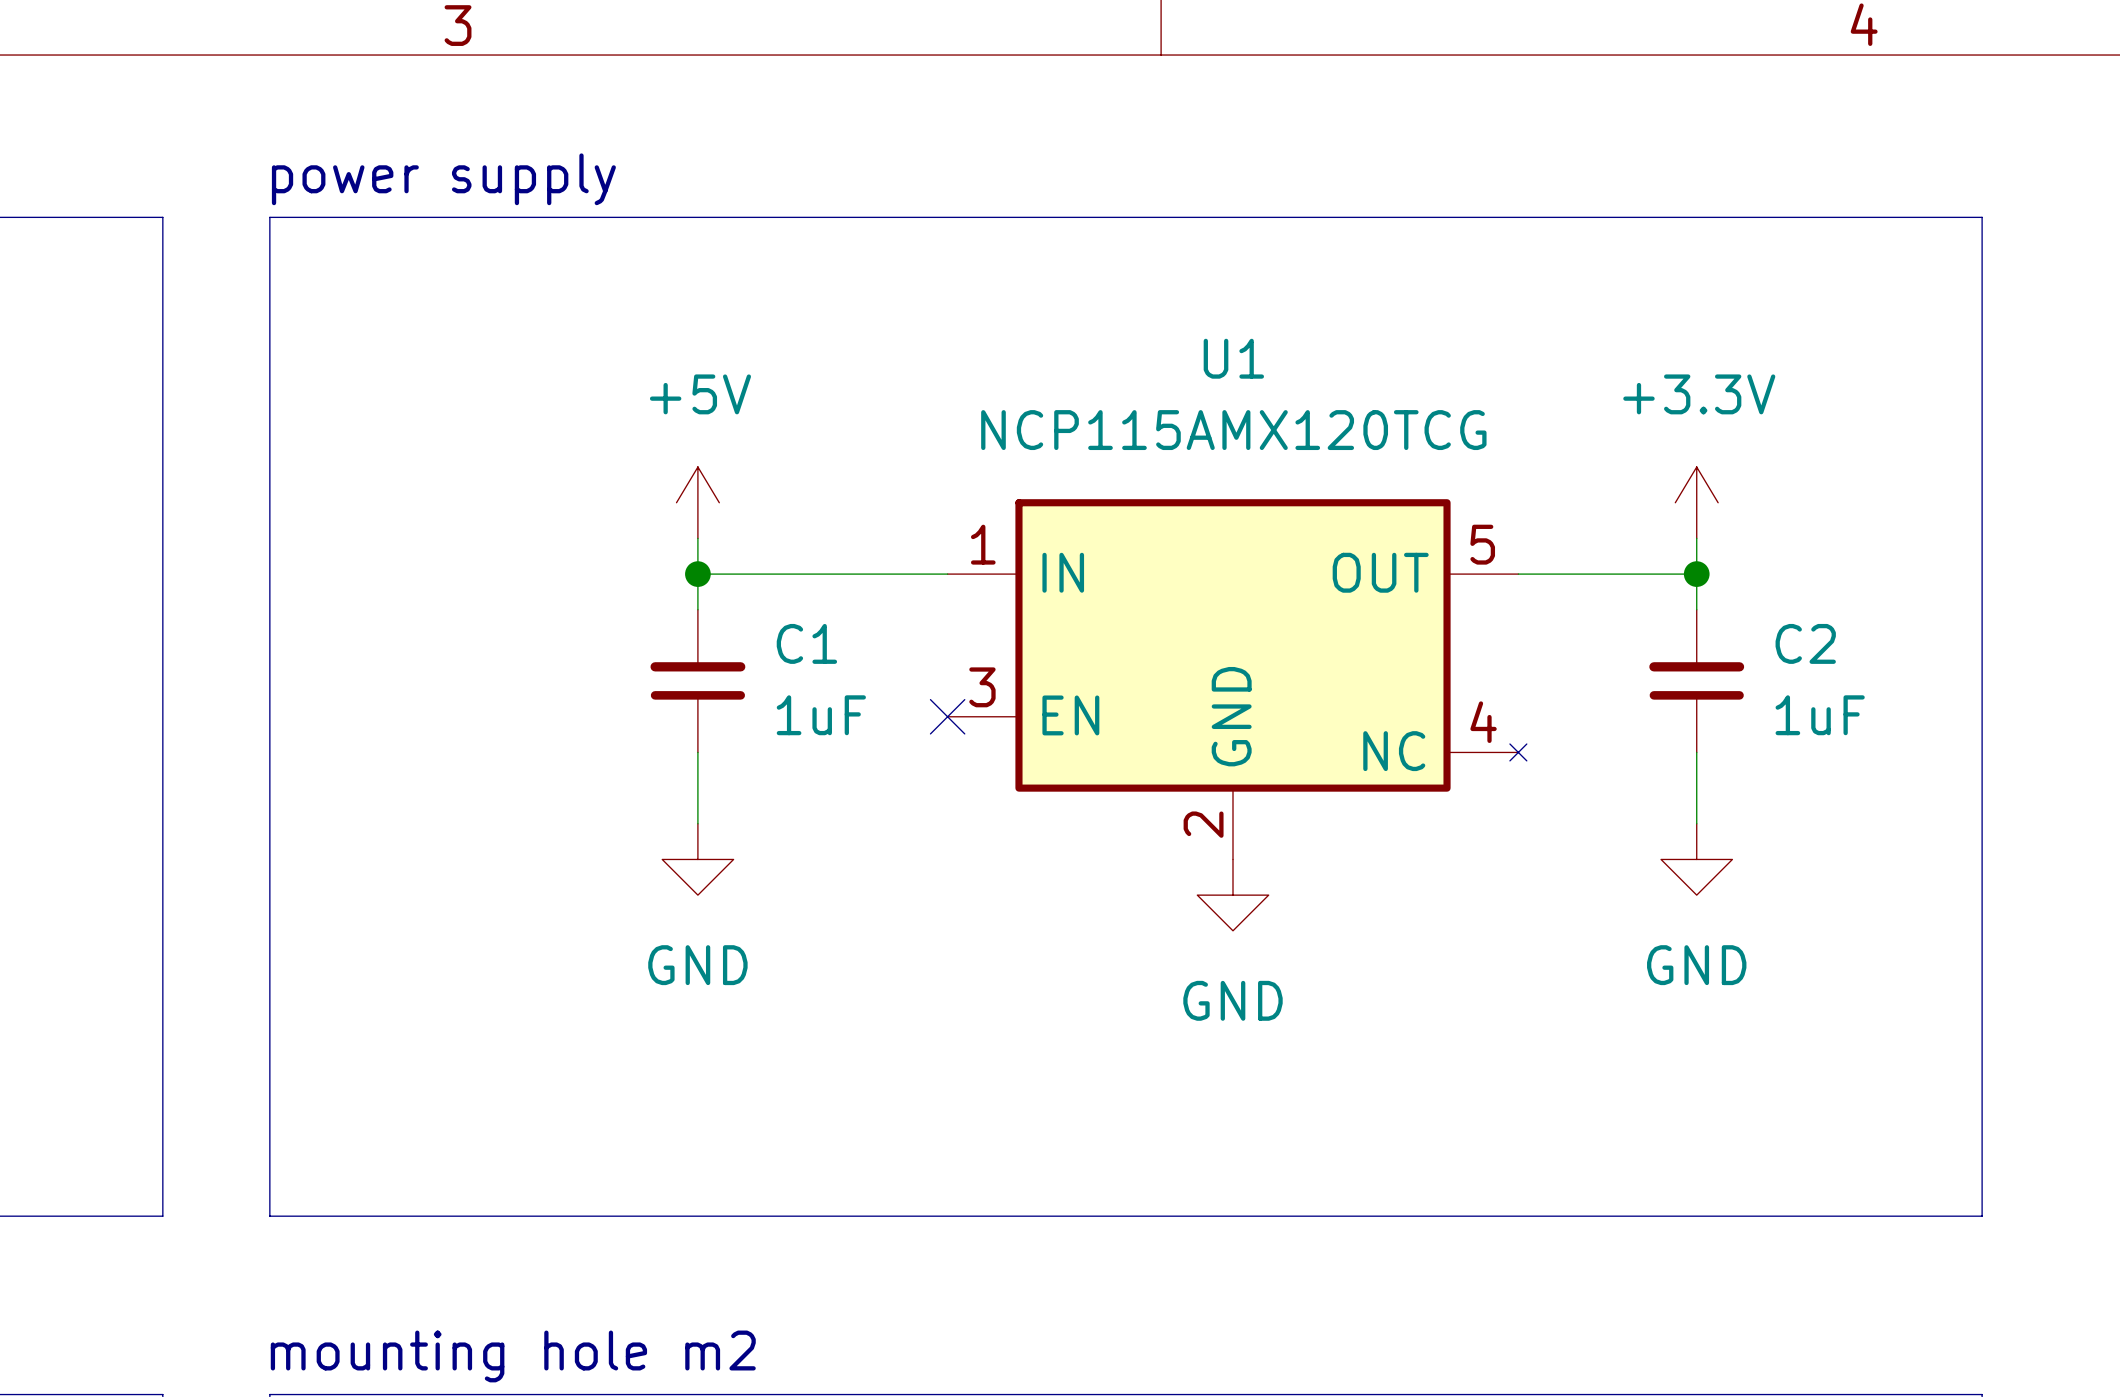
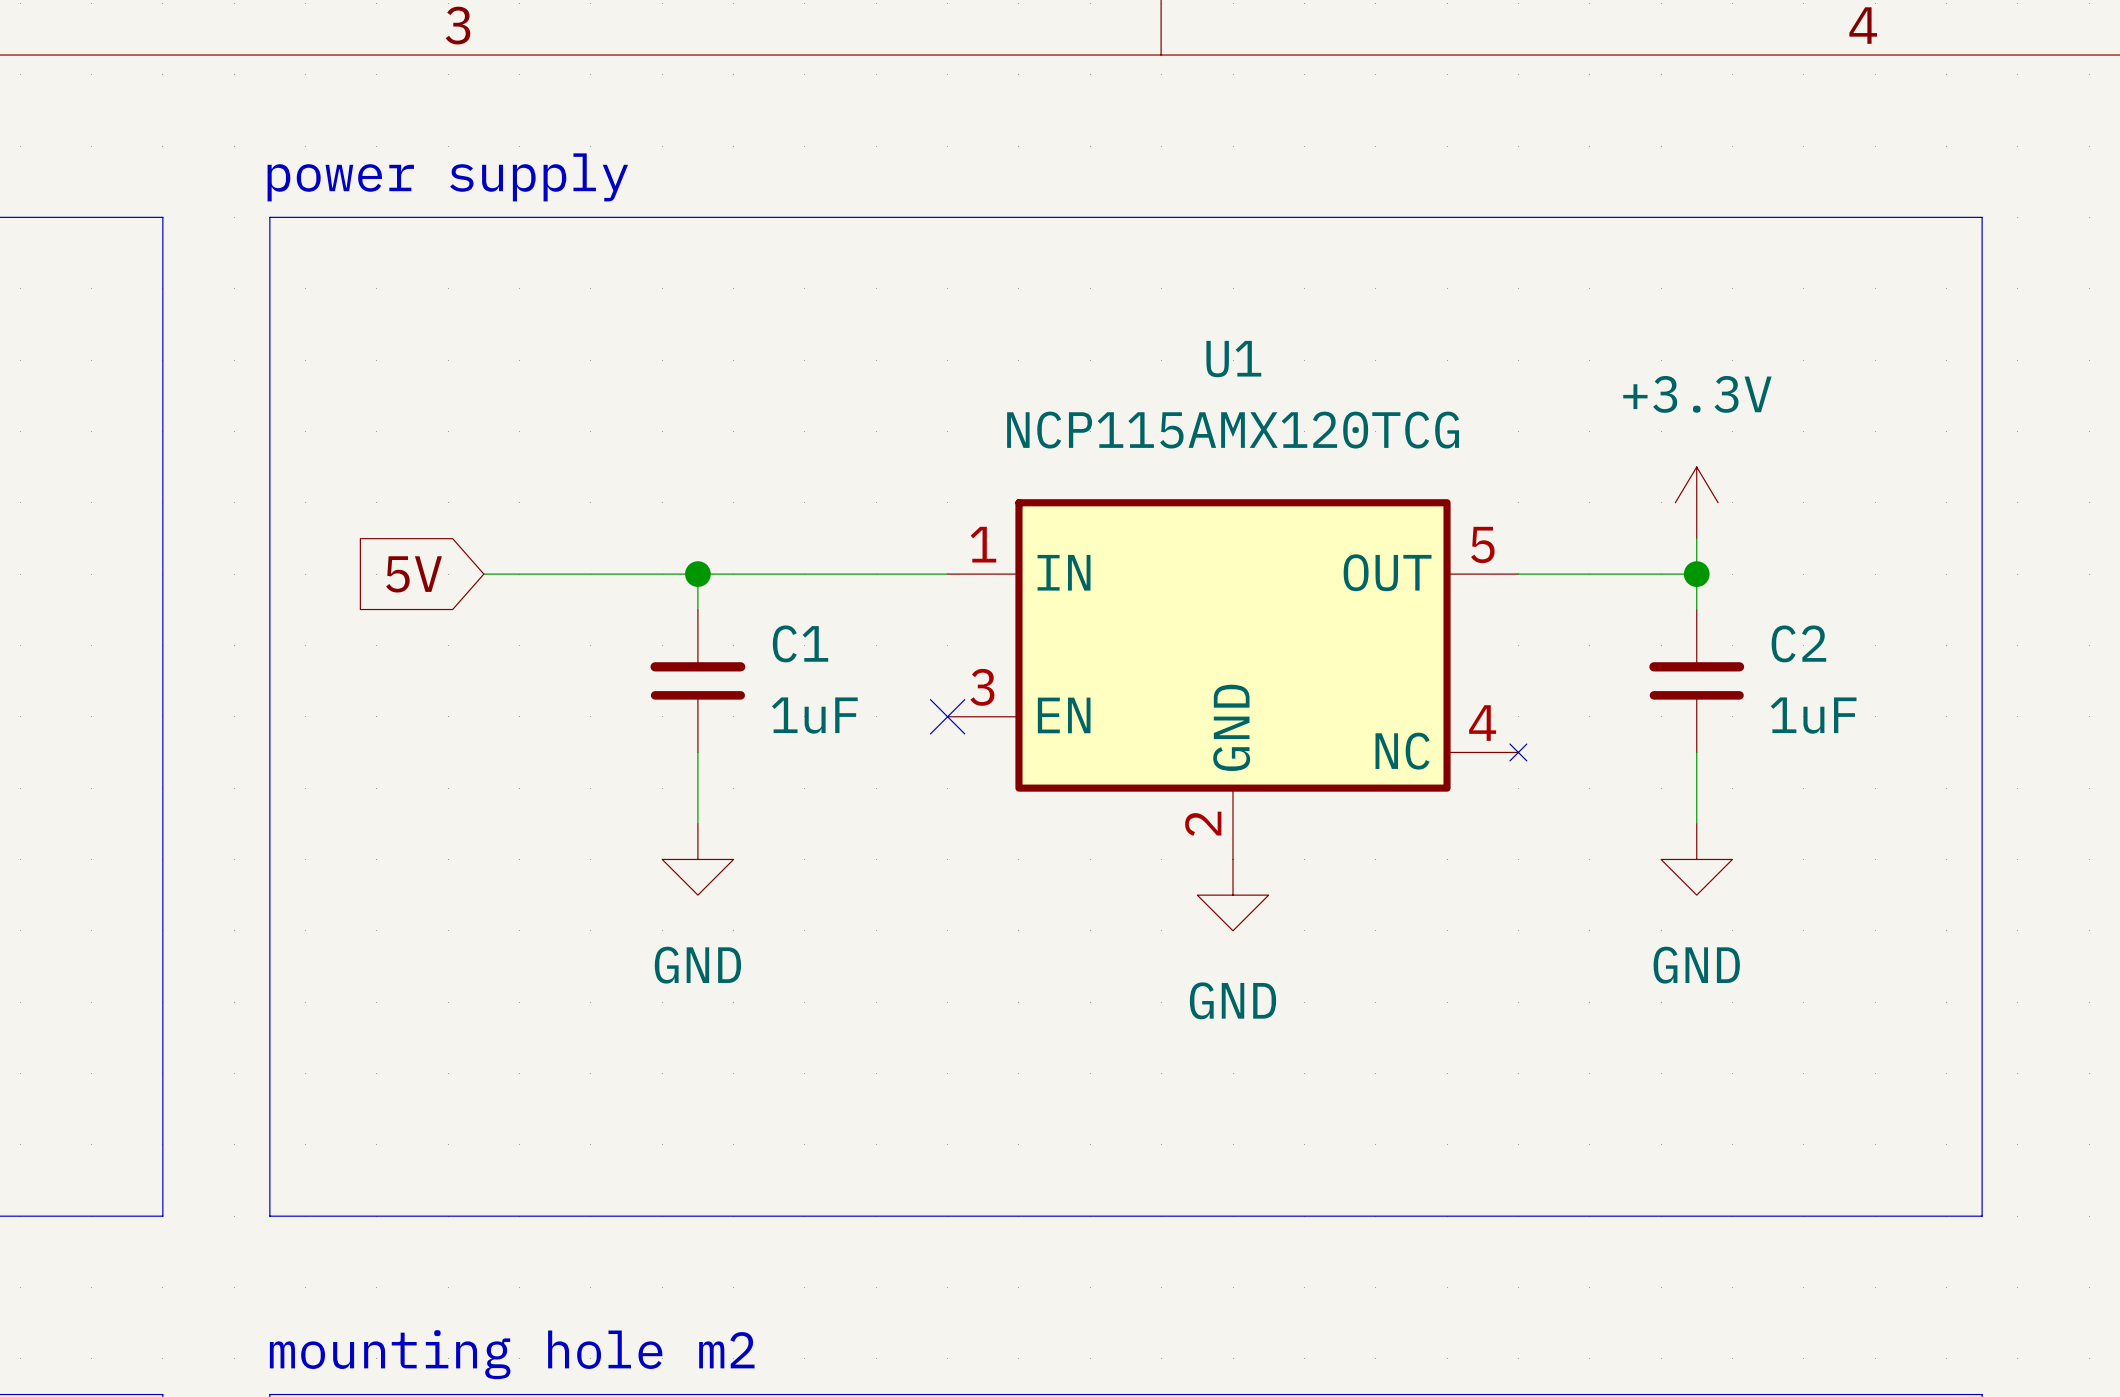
power symbol: +5V (697, 502) -> none
wire: (697, 538) (697, 574) -> (483, 574) (697, 574)
global label: none -> 5V (414, 574)

